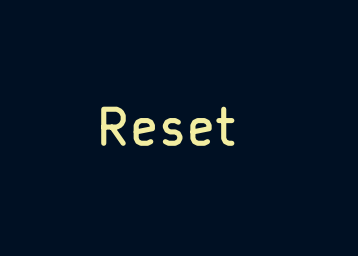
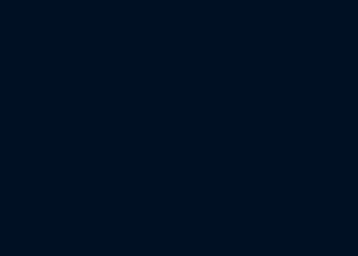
text: Reset (167, 126) -> none

